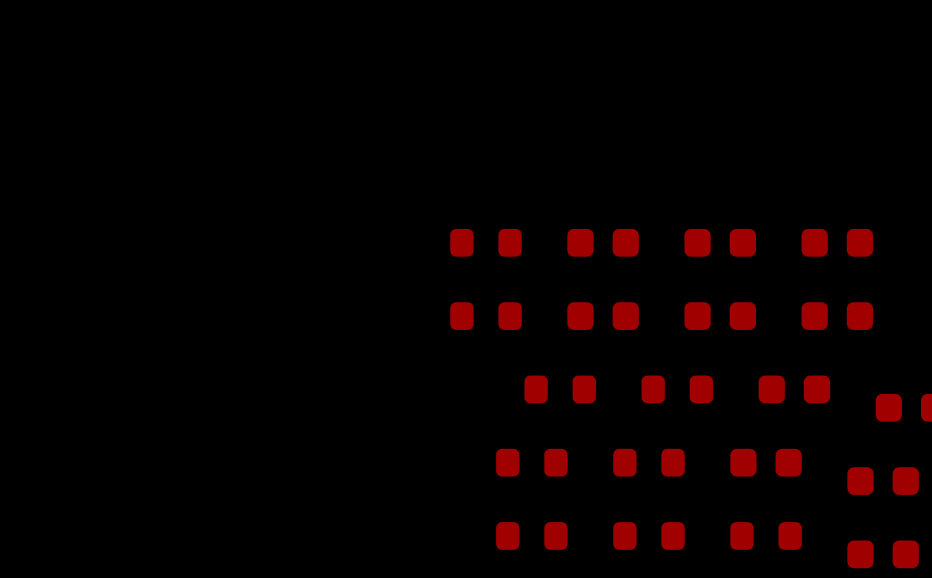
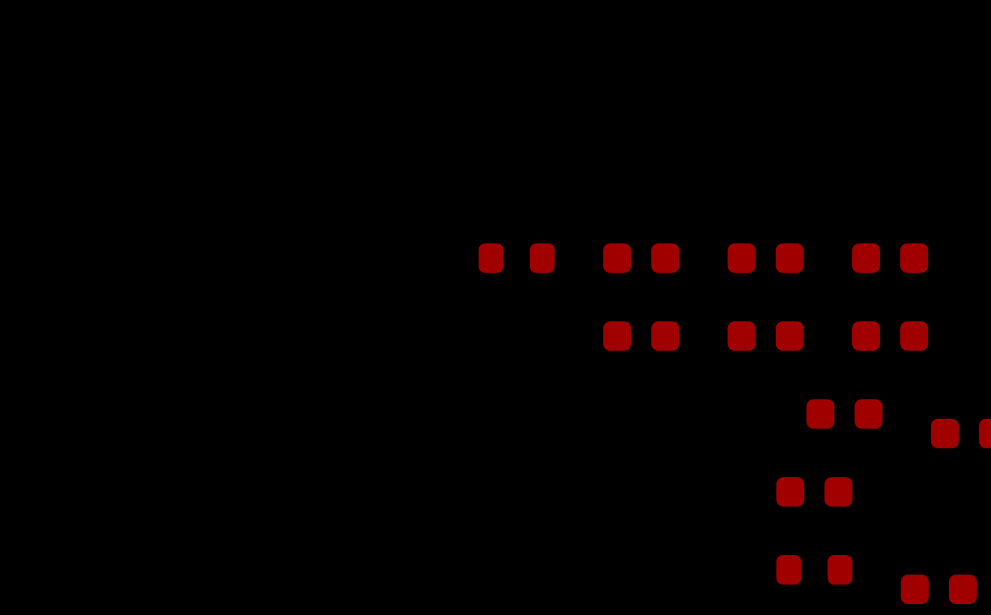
part: (486, 316) -> none
part: (560, 389) -> none
part: (677, 389) -> none
part: (531, 462) -> none
part: (648, 462) -> none
part: (883, 481) -> none
part: (531, 535) -> none
part: (648, 535) -> none

